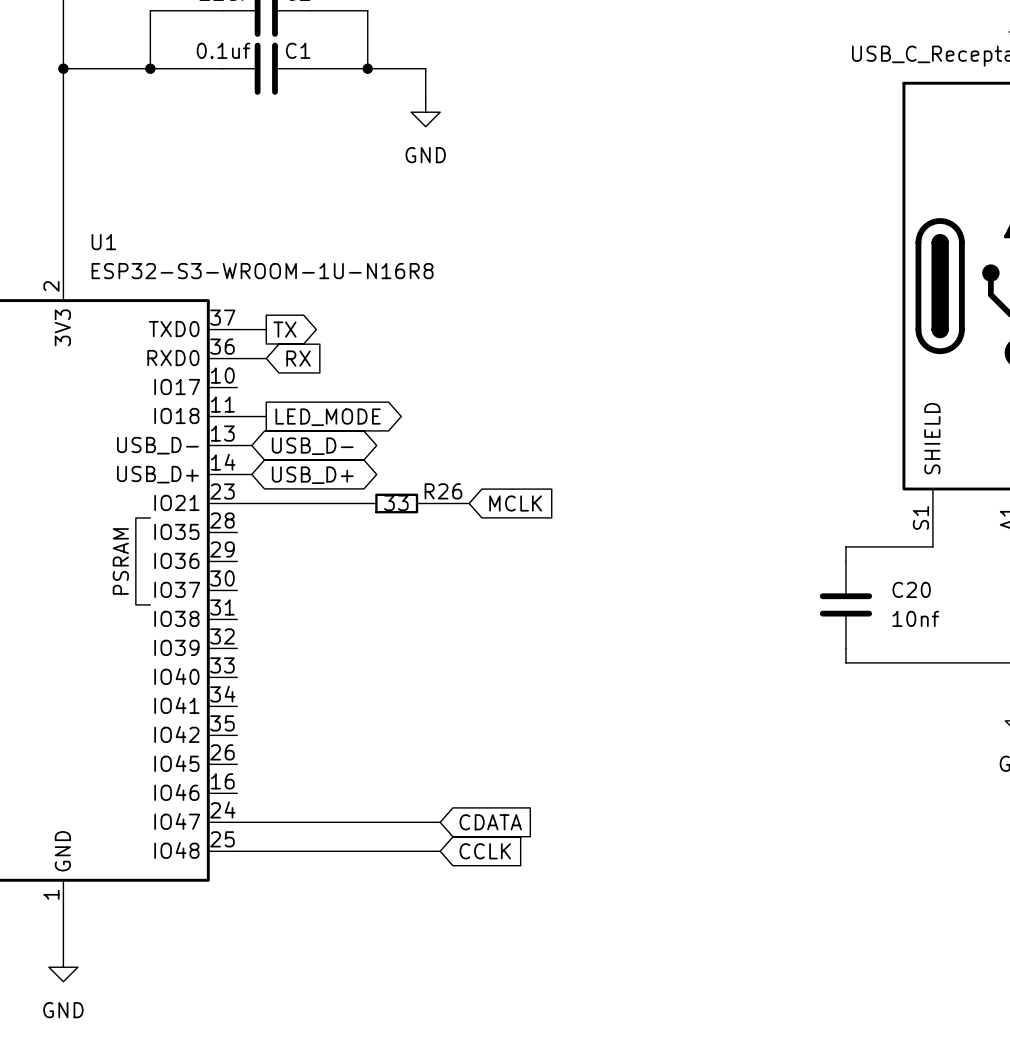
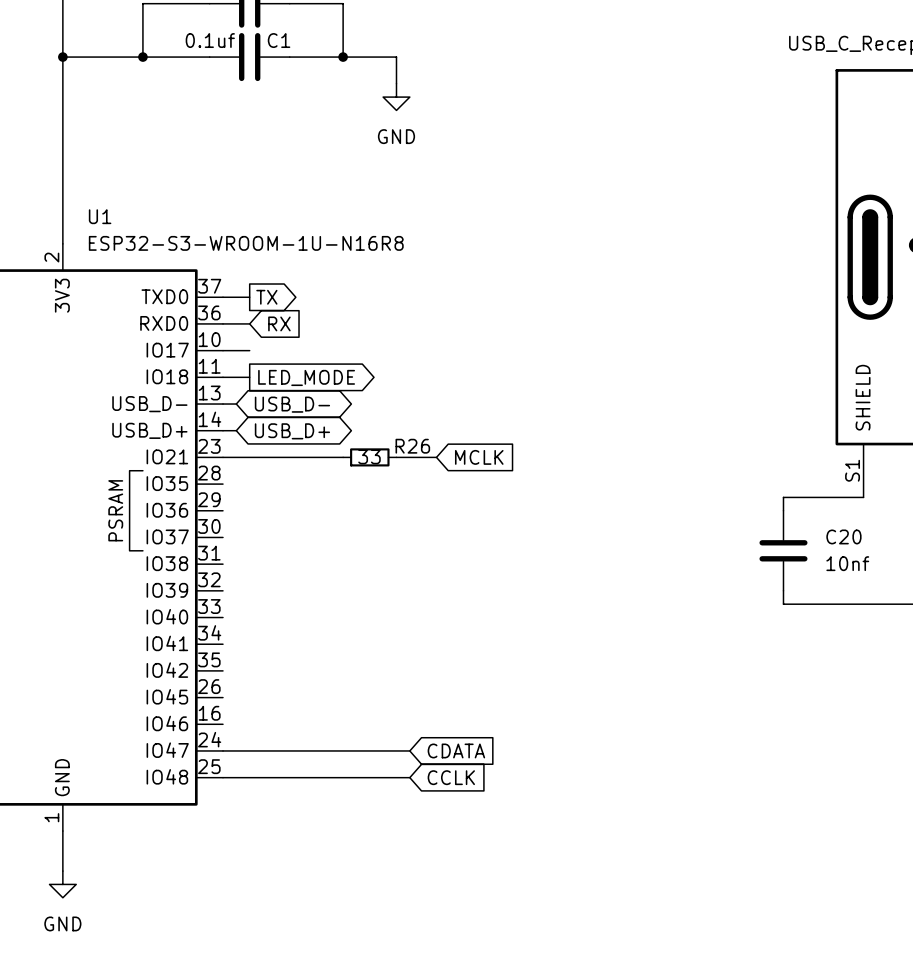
wire: none -> (223, 350) (249, 350)

